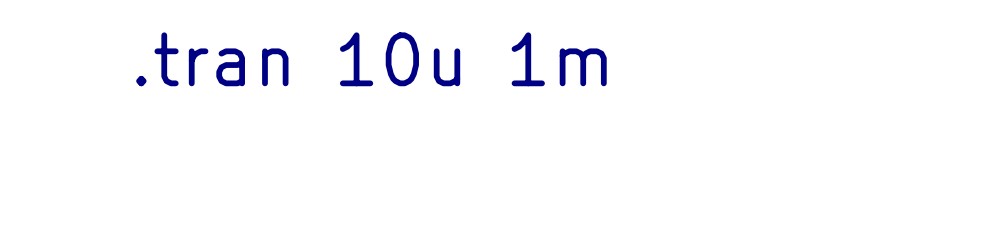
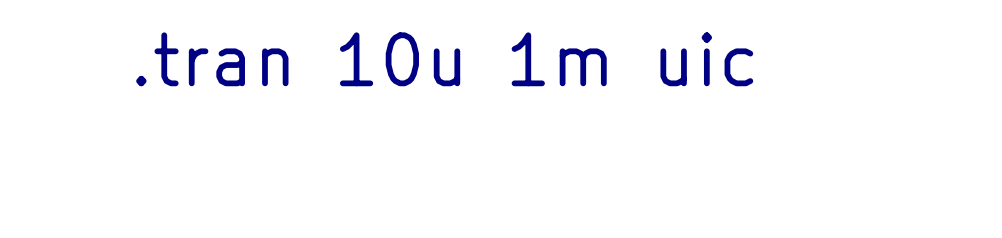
text: .tran 10u 1m (371, 59) -> .tran 10u 1m uic (444, 59)

